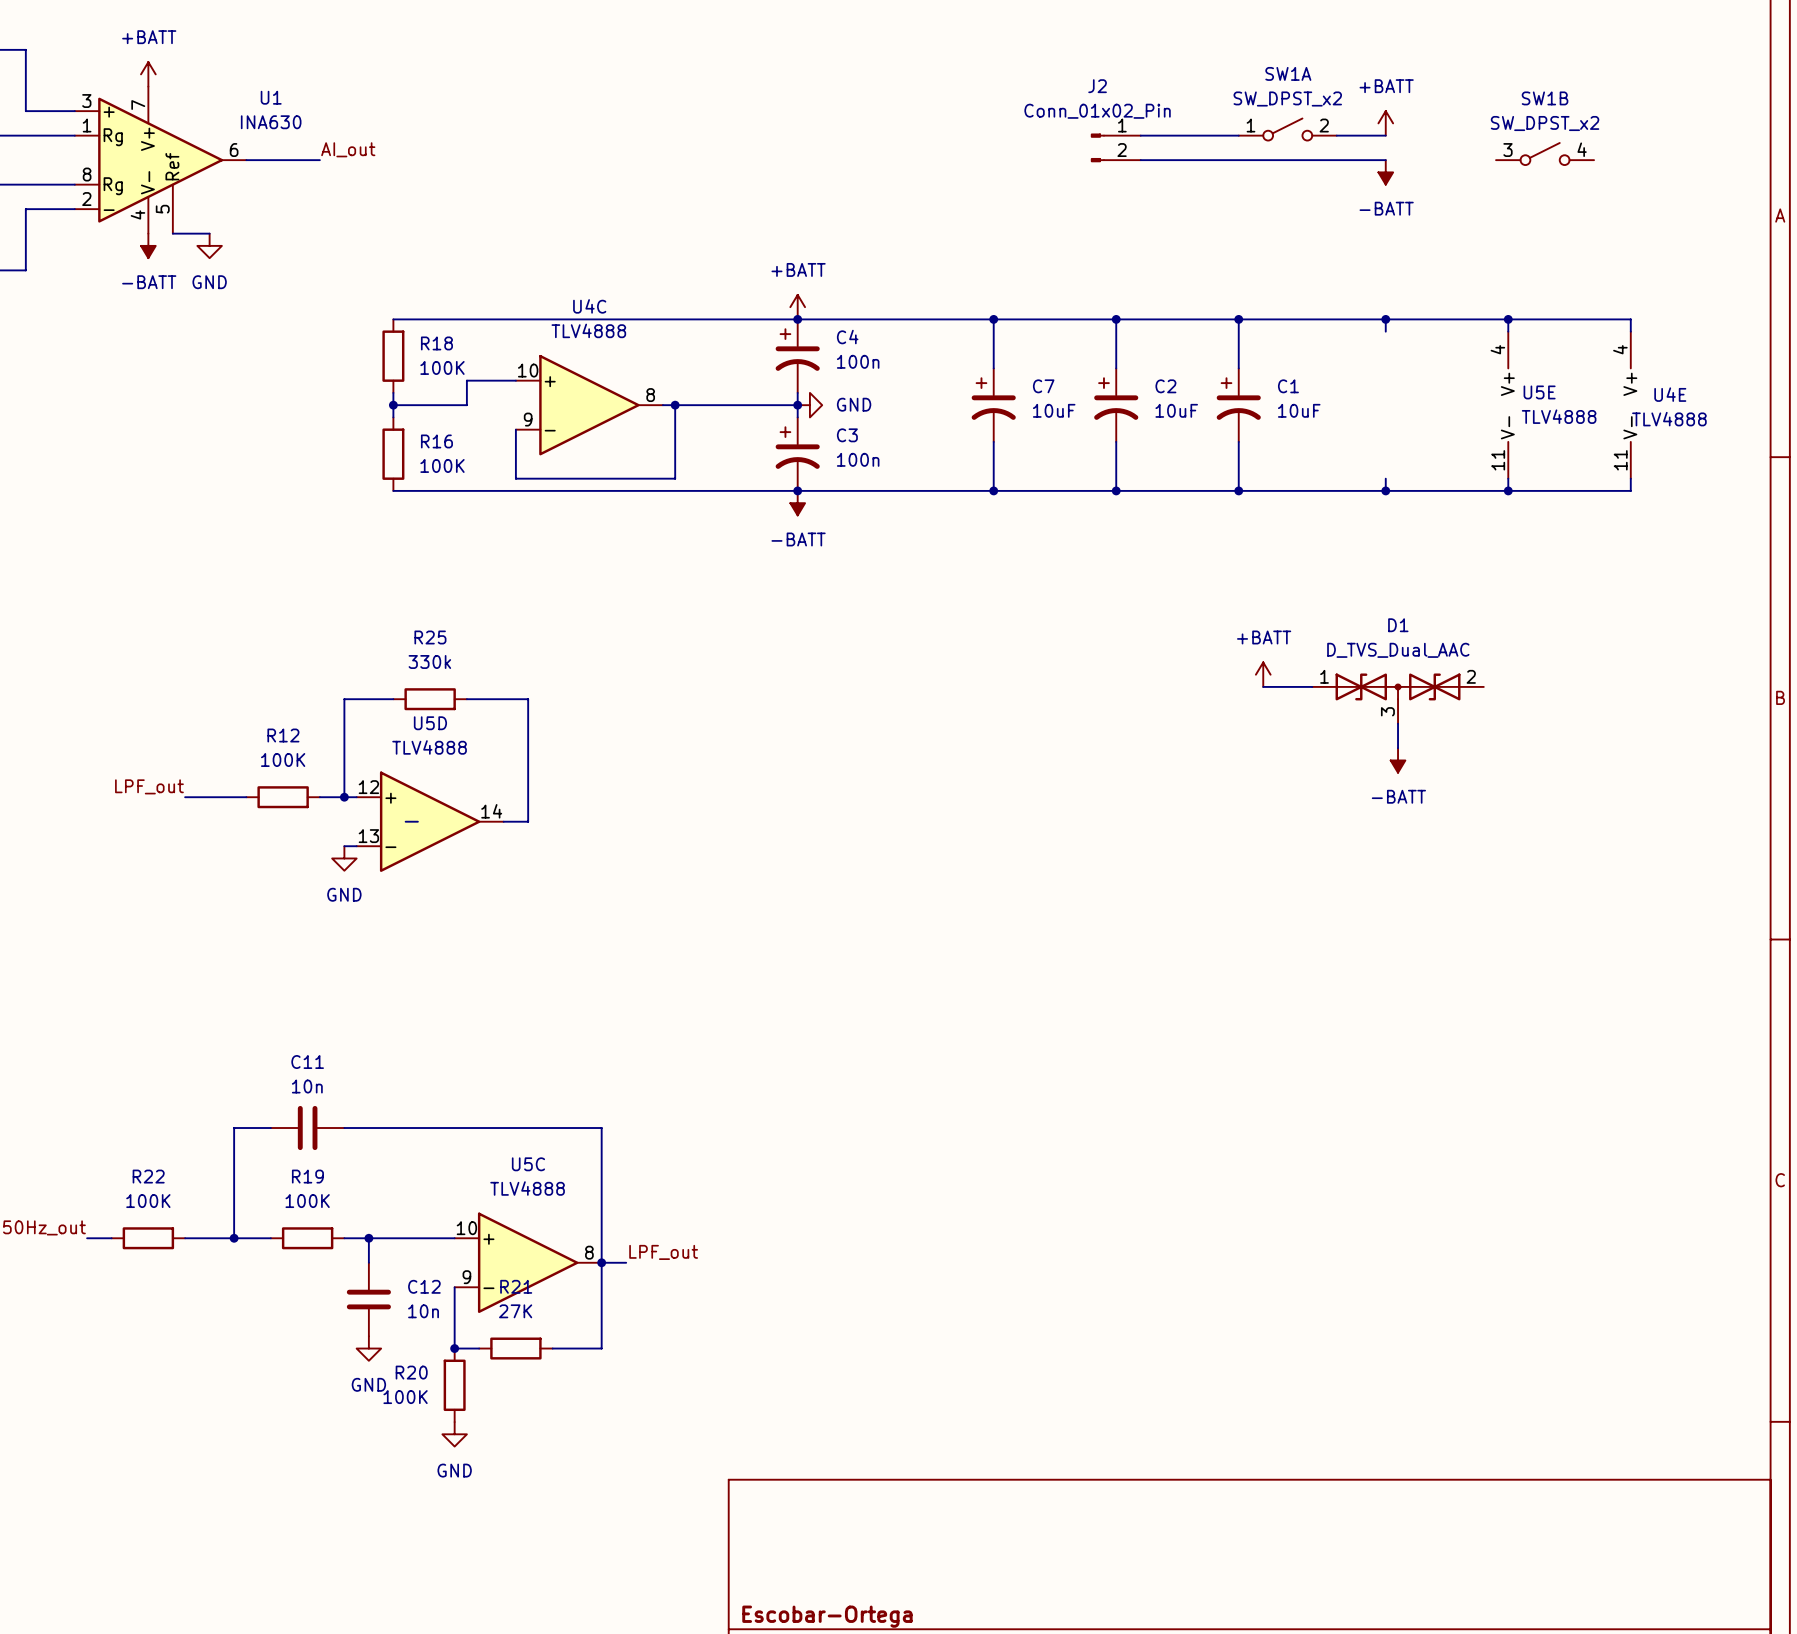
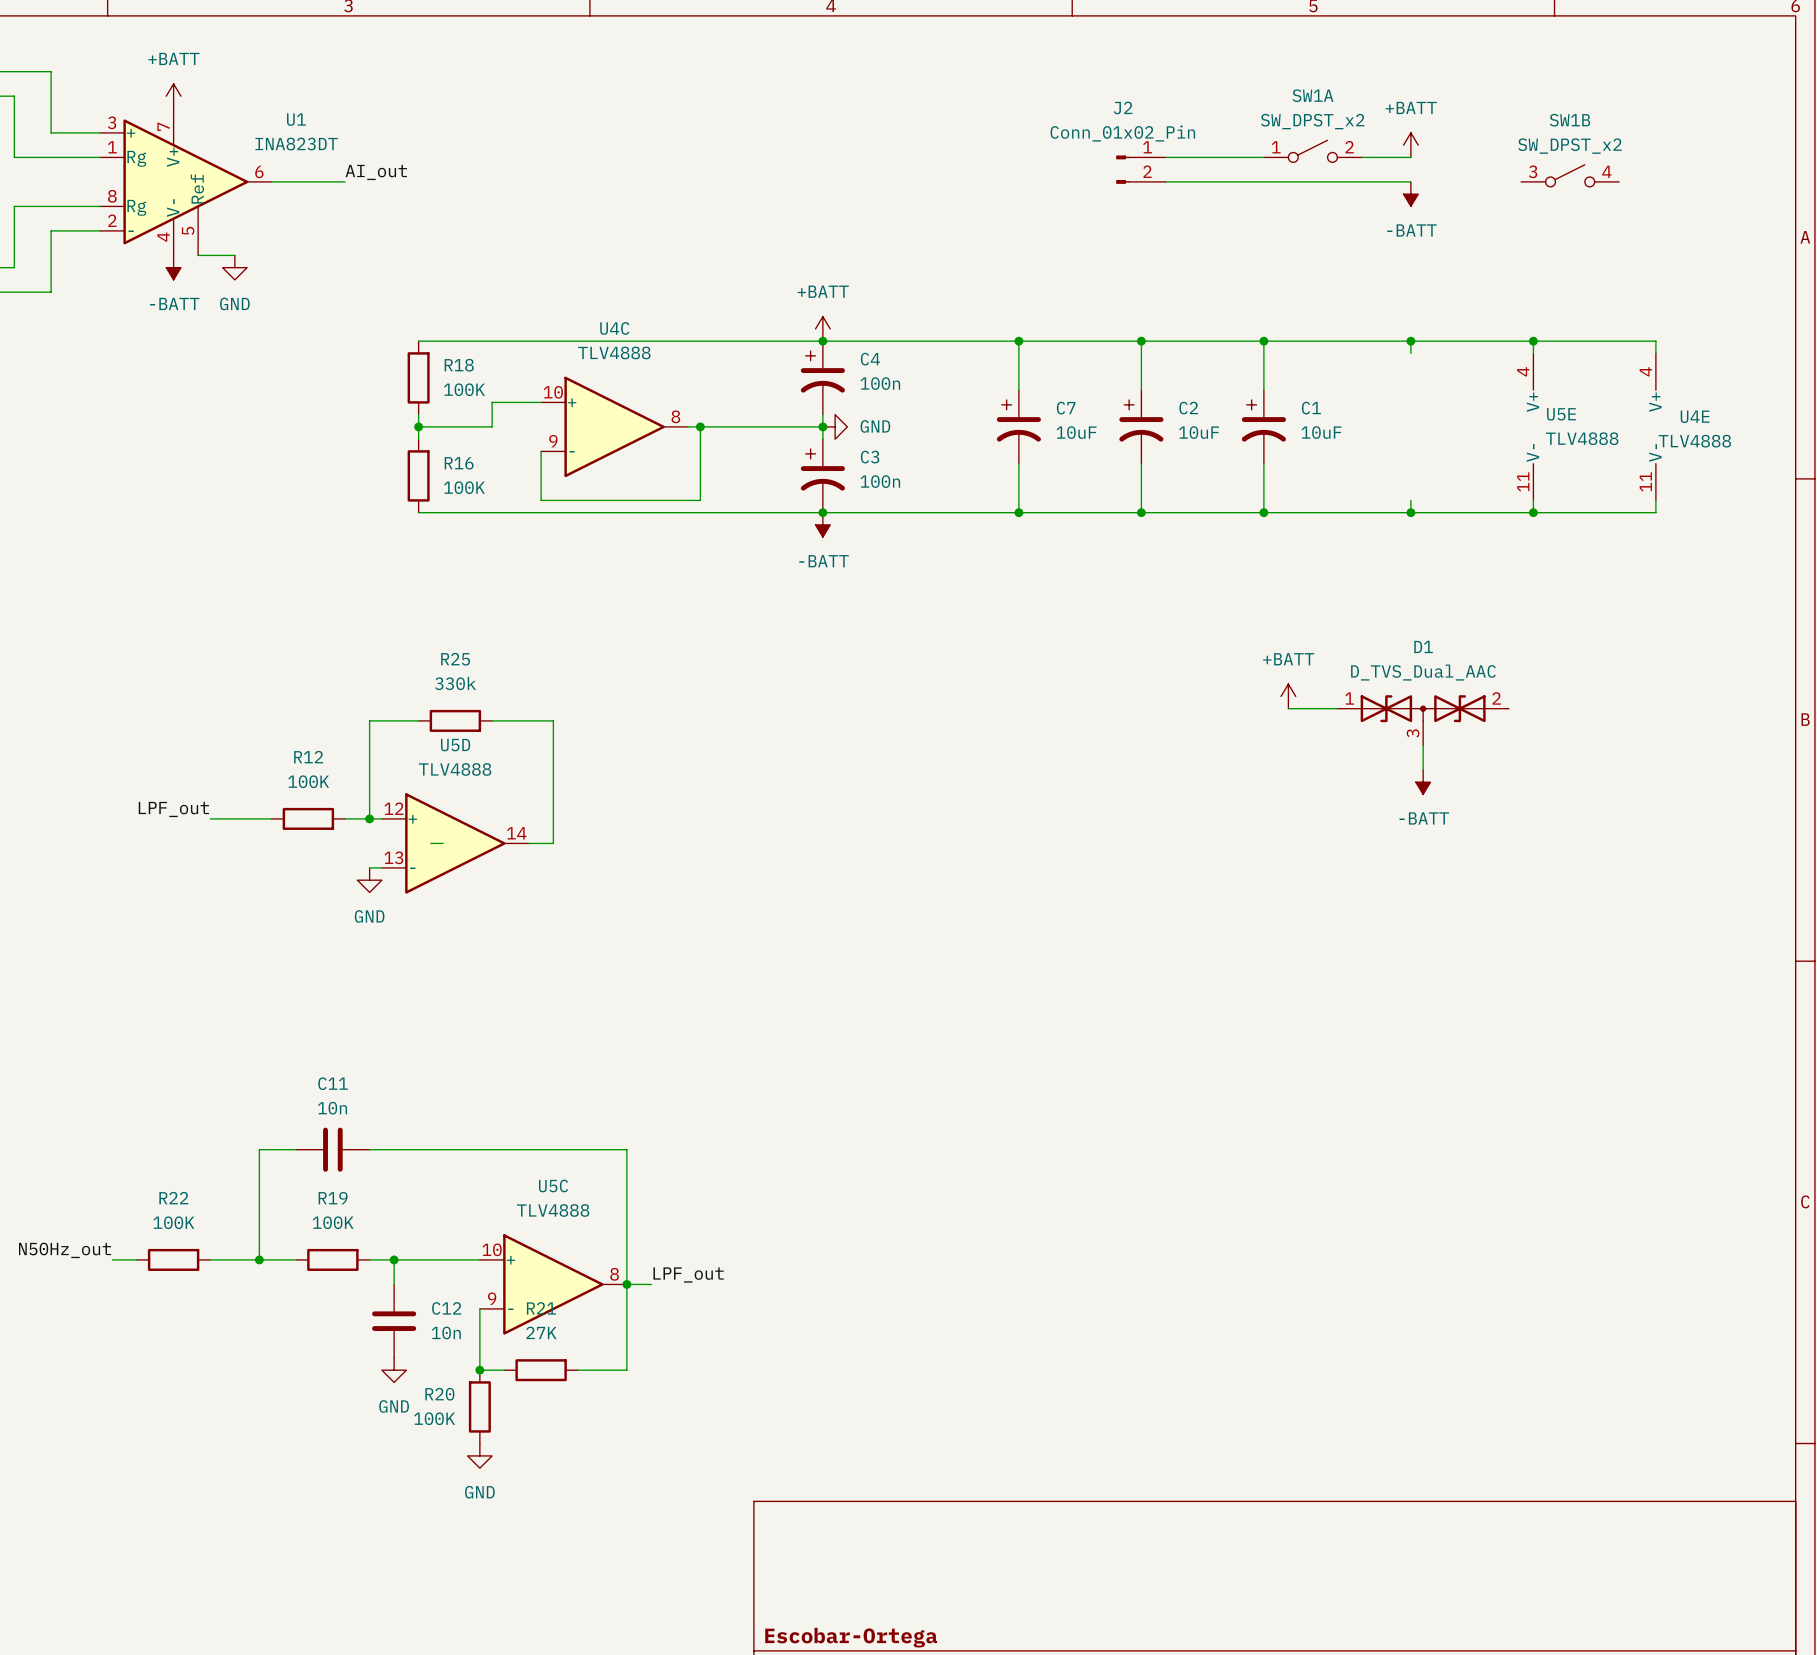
U1 value: INA630 (271, 122) -> INA823DT (296, 144)

